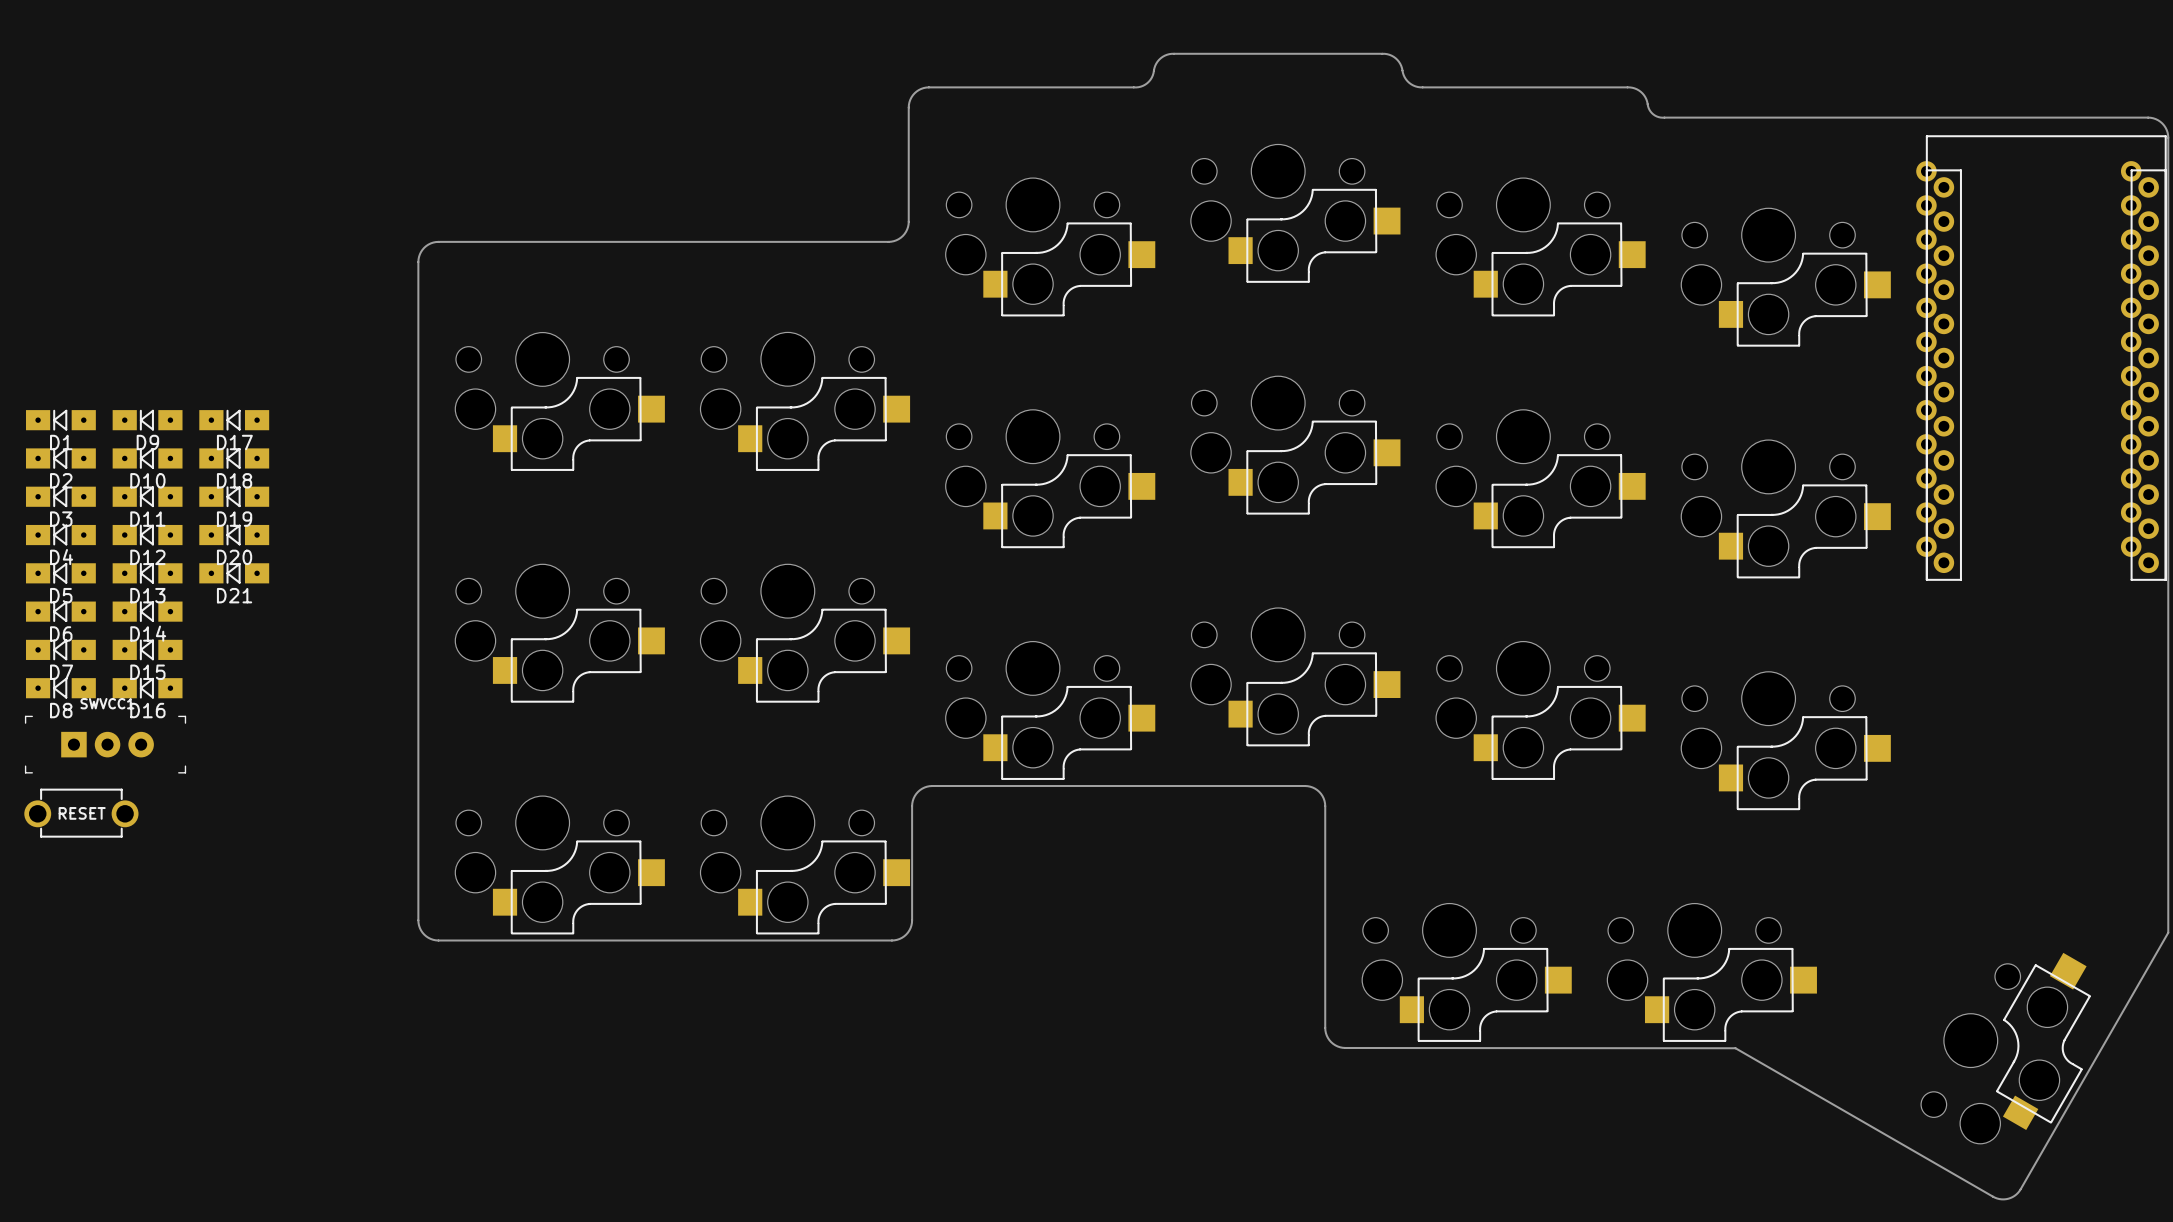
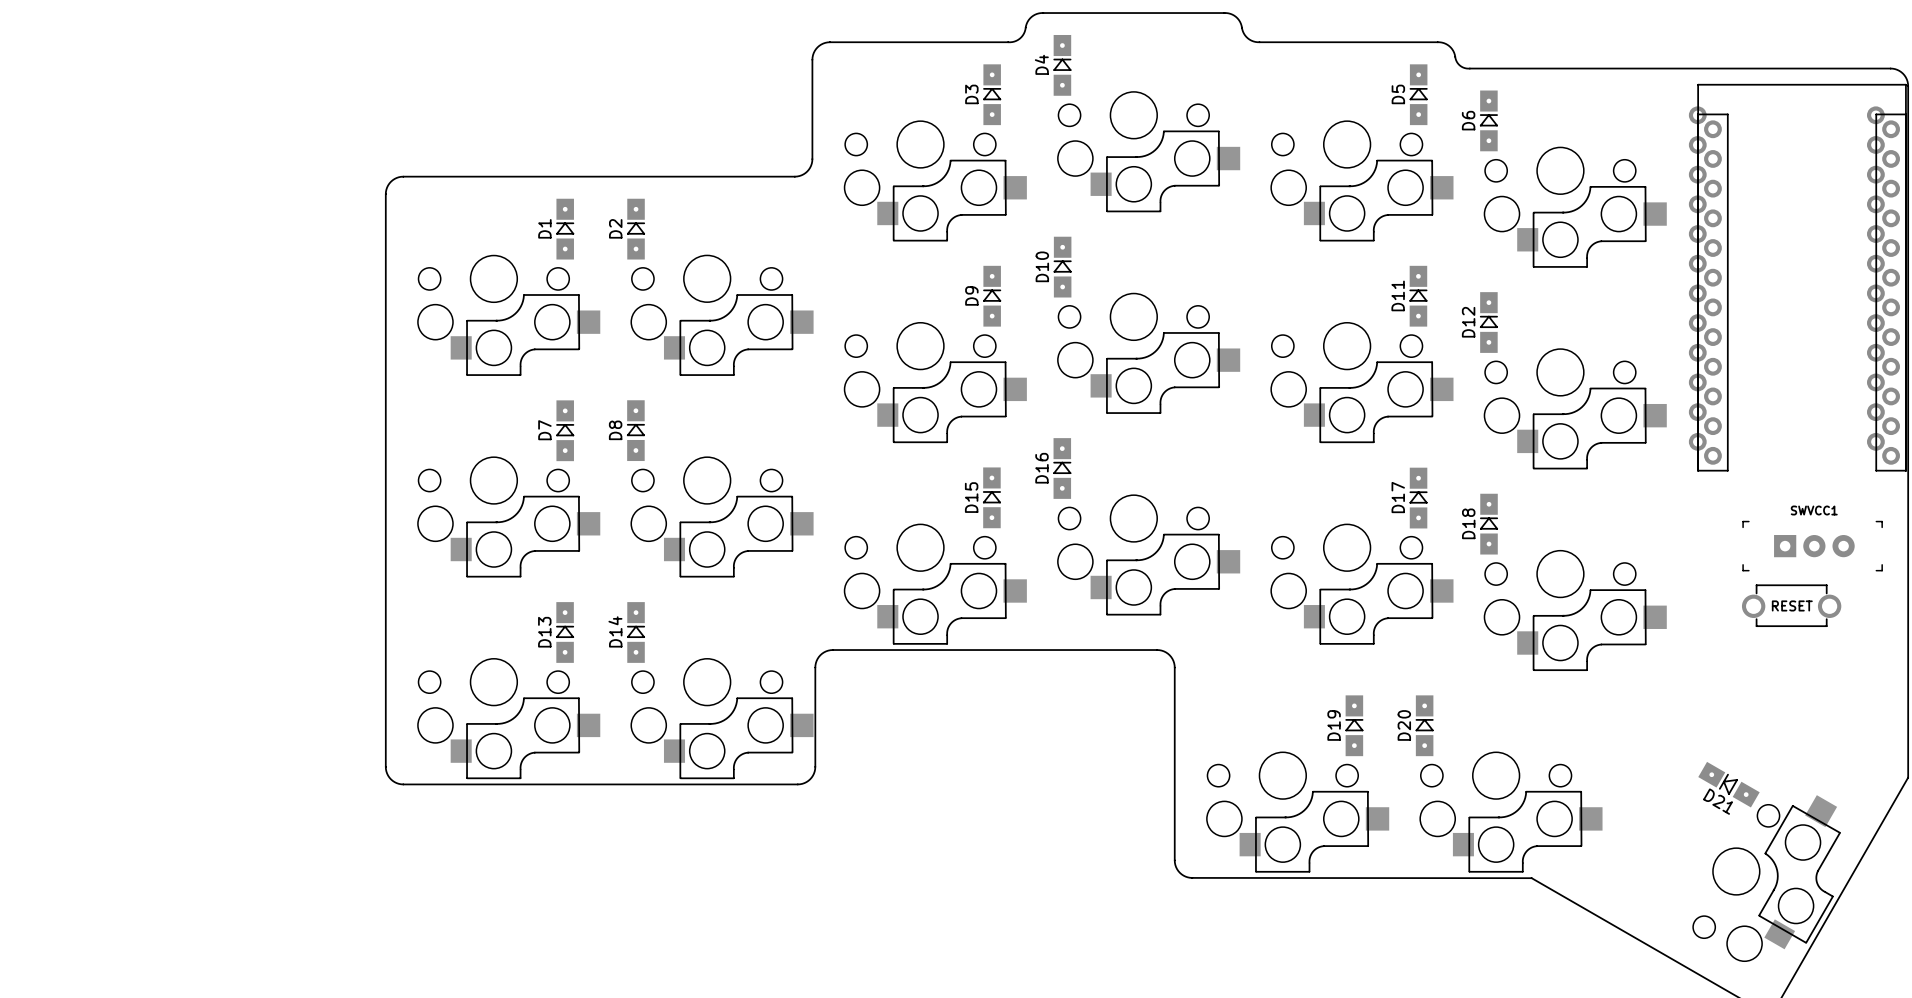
D1 rotation: 0° (60, 420) -> 90° clockwise (565, 229)
D1 position: (60, 420) -> (565, 229)
D9 rotation: 0° (147, 420) -> 90° clockwise (992, 296)
D9 position: (147, 420) -> (992, 296)
D17 rotation: 0° (234, 420) -> 90° clockwise (1418, 498)
D17 position: (234, 420) -> (1418, 498)
D2 rotation: 0° (60, 458) -> 90° clockwise (636, 229)
D2 position: (60, 458) -> (636, 229)
D10 rotation: 0° (147, 458) -> 90° clockwise (1062, 267)
D10 position: (147, 458) -> (1062, 267)
D18 rotation: 0° (234, 458) -> 90° clockwise (1489, 524)
D18 position: (234, 458) -> (1489, 524)
D3 rotation: 0° (60, 496) -> 90° clockwise (992, 94)
D3 position: (60, 496) -> (992, 94)
D11 rotation: 0° (147, 496) -> 90° clockwise (1418, 296)
D11 position: (147, 496) -> (1418, 296)
D19 rotation: 0° (234, 496) -> 90° clockwise (1354, 725)
D19 position: (234, 496) -> (1354, 725)
D4 rotation: 0° (60, 535) -> 90° clockwise (1062, 65)
D4 position: (60, 535) -> (1062, 65)
D12 rotation: 0° (147, 535) -> 90° clockwise (1488, 322)
D12 position: (147, 535) -> (1488, 322)
D20 rotation: 0° (234, 535) -> 90° clockwise (1424, 725)
D20 position: (234, 535) -> (1424, 725)
D5 rotation: 0° (60, 573) -> 90° clockwise (1418, 94)
D5 position: (60, 573) -> (1418, 94)
D13 rotation: 0° (147, 573) -> 90° clockwise (565, 632)
D13 position: (147, 573) -> (565, 632)
D21 rotation: 0° (234, 573) -> 30° clockwise (1728, 784)
D21 position: (234, 573) -> (1728, 784)
D6 rotation: 0° (60, 611) -> 90° clockwise (1488, 120)
D6 position: (60, 611) -> (1488, 120)
D14 rotation: 0° (147, 611) -> 90° clockwise (636, 632)
D14 position: (147, 611) -> (636, 632)
D7 rotation: 0° (60, 649) -> 90° clockwise (565, 430)
D7 position: (60, 649) -> (565, 430)
D15 rotation: 0° (147, 649) -> 90° clockwise (991, 497)
D15 position: (147, 649) -> (991, 497)
D8 rotation: 0° (60, 688) -> 90° clockwise (635, 430)
D8 position: (60, 688) -> (635, 430)
D16 rotation: 0° (147, 688) -> 90° clockwise (1062, 468)
D16 position: (147, 688) -> (1062, 468)
part: none -> (1791, 605)
SWVCC1 position: (105, 744) -> (1812, 546)
part: (81, 813) -> none

